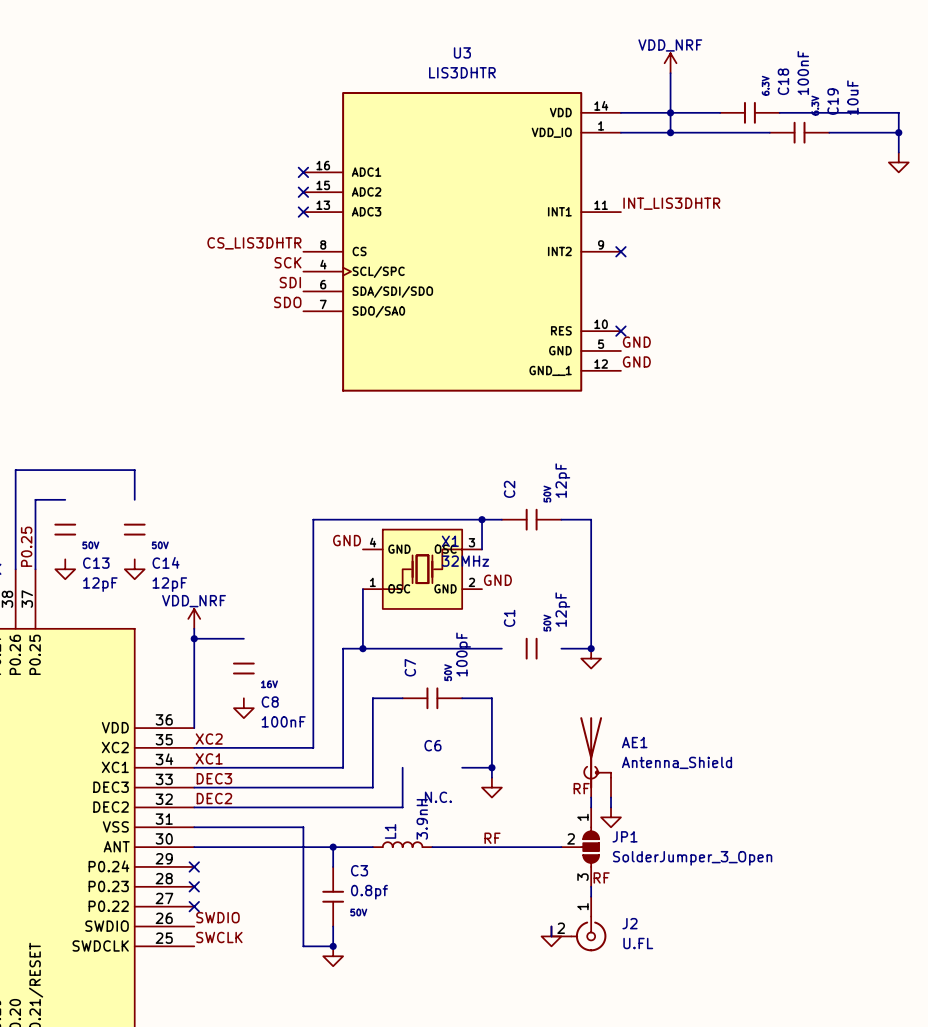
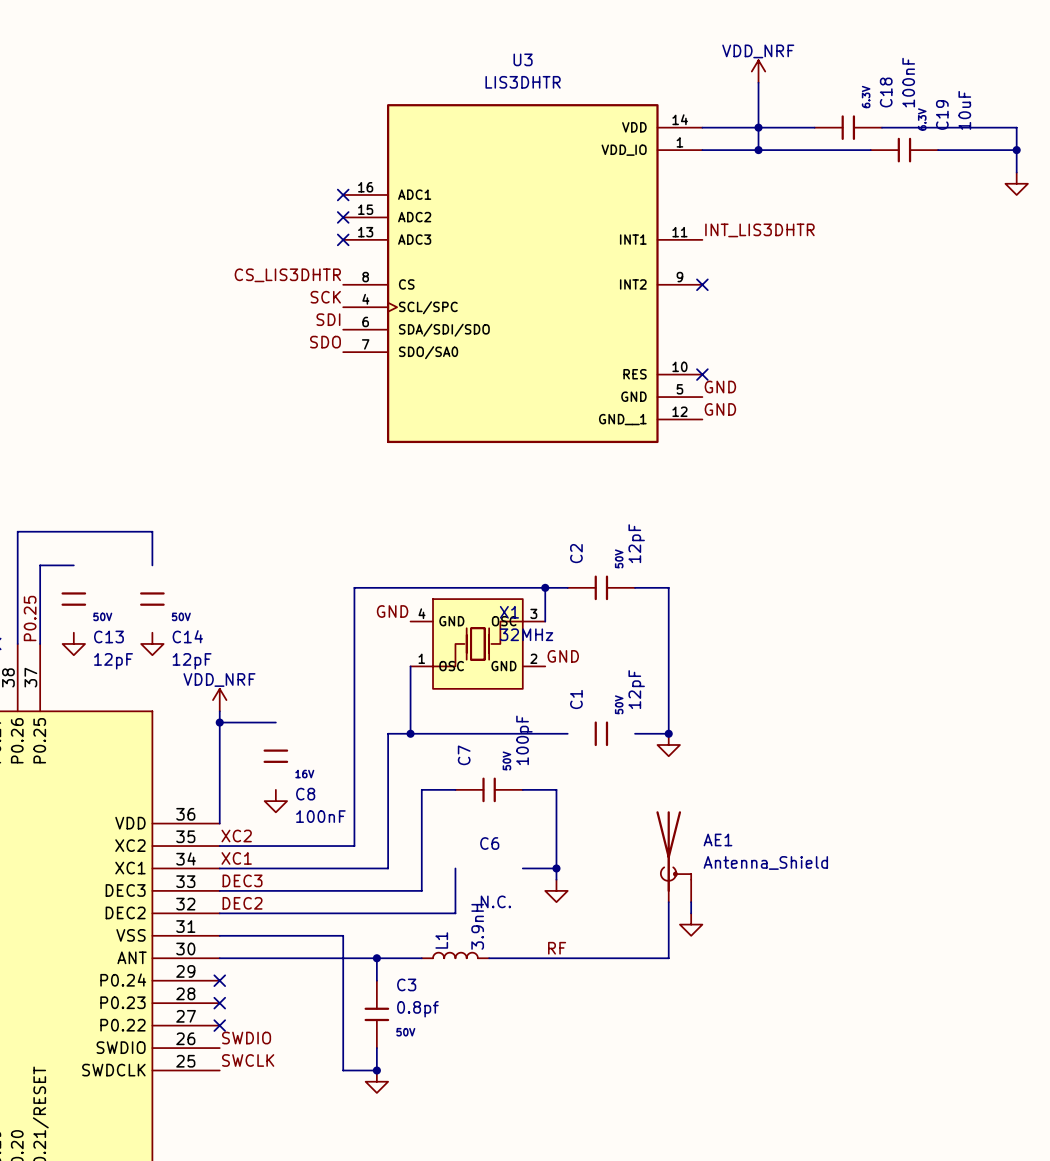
label: RF (581, 788) -> none
JP1: SolderJumper_3_Open (580, 847) -> none
label: RF (601, 877) -> none
wire: (591, 886) (591, 896) -> none
J2: U.FL (578, 924) -> none
wire: (551, 926) (551, 936) -> none
power symbol: (551, 936) -> none

